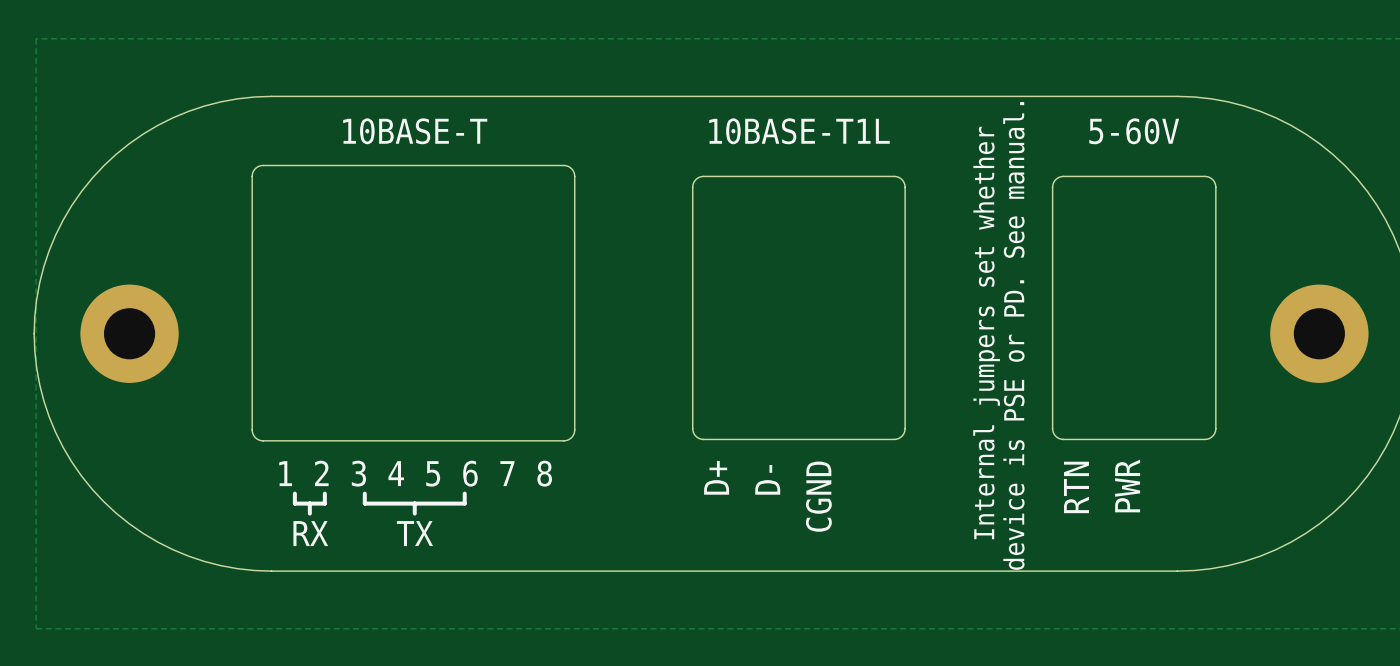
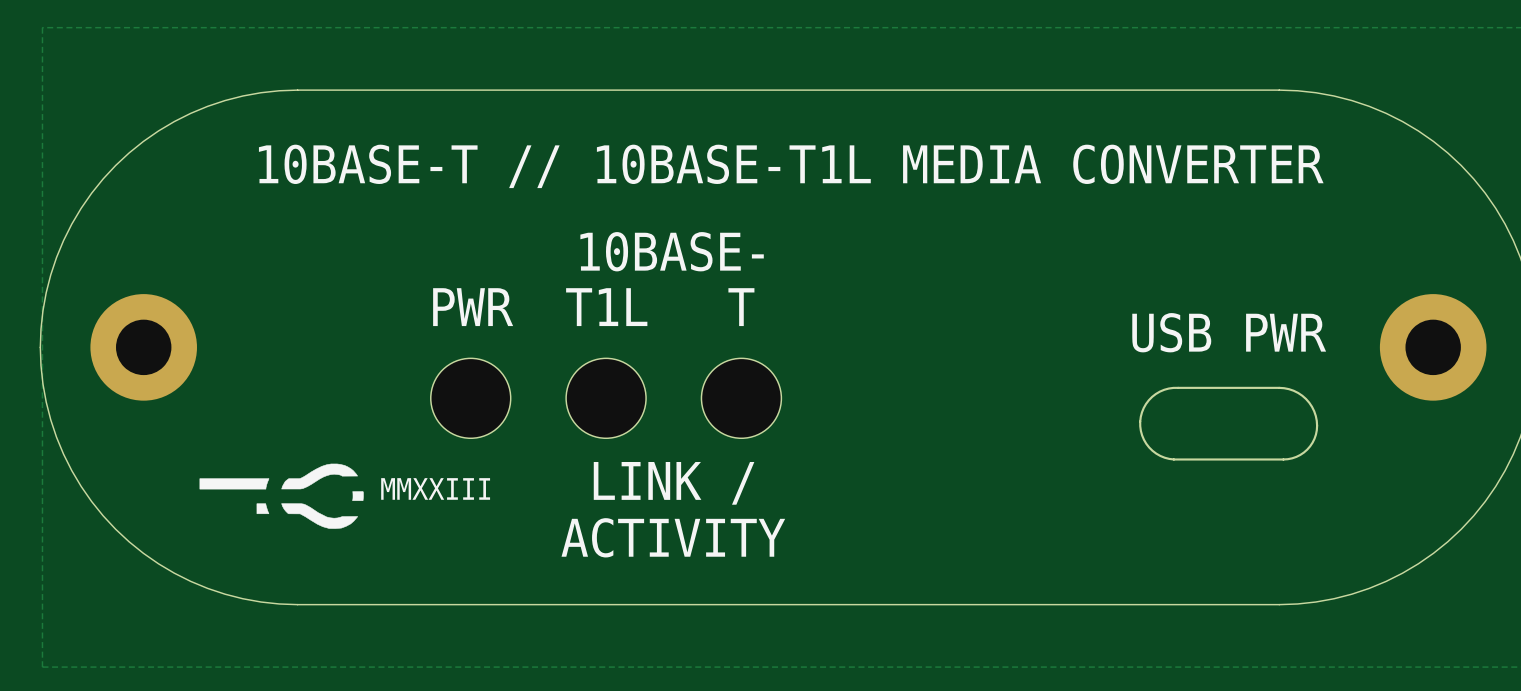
text: 10BASE-T (415, 131) -> none
text: 10BASE-T1L (799, 131) -> none
text: 5-60V (1134, 131) -> none
board edge: (263, 165) (563, 165) (571, 168) (574, 176) (574, 429) (571, 437) (563, 440) (263, 440) (255, 437) (252, 429) (252, 176) (255, 168) (263, 165) -> none
text: none -> 10BASE-T // 10BASE-T1L MEDIA CONVERTER (791, 166)
board edge: (703, 176) (894, 176) (902, 180) (905, 187) (905, 428) (900, 437) (894, 439) (703, 439) (694, 435) (692, 428) (692, 187) (695, 179) (703, 176) -> none
board edge: (1063, 176) (1204, 176) (1214, 181) (1215, 428) (1210, 437) (1063, 439) (1054, 434) (1052, 187) (1055, 179) (1063, 176) -> none
text: none -> 10BASE- (672, 251)
text: none -> PWR (473, 307)
text: none -> T1L (606, 307)
text: none -> T (741, 307)
text: none -> USB PWR (1229, 332)
text: Internal jumpers set whether (986, 333) -> none
text: device is PSE or PD. See manual. (1013, 335) -> none
board edge: none -> (1178, 387) (1279, 387) (1293, 390) (1306, 398) (1314, 411) (1317, 425) (1314, 438) (1303, 452) (1287, 459) (1173, 459) (1164, 457) (1152, 450) (1146, 443) (1140, 430) (1140, 416) (1146, 403) (1152, 396) (1164, 389) (1178, 387)
hole: none -> (470, 398)
hole: none -> (606, 398)
hole: none -> (741, 398)
drawing: none -> [199, 463, 364, 529]
text: none -> LINK / (674, 483)
text: none -> MMXXIII (435, 488)
text: 1 2 3 4 5 6 7 8 (415, 473) -> none
text: D+ (716, 477) -> none
text: D- (767, 479) -> none
text: PWR (1127, 485) -> none
text: RTN (1076, 487) -> none
line: (294, 493) (294, 503) (324, 503) (324, 493) -> none
line: (364, 493) (364, 503) (464, 503) (464, 493) -> none
text: CGND (818, 496) -> none
line: (309, 503) (309, 513) -> none
line: (414, 503) (414, 513) -> none
text: none -> ACTIVITY (673, 537)
text: RX (310, 533) -> none
text: TX (414, 533) -> none

